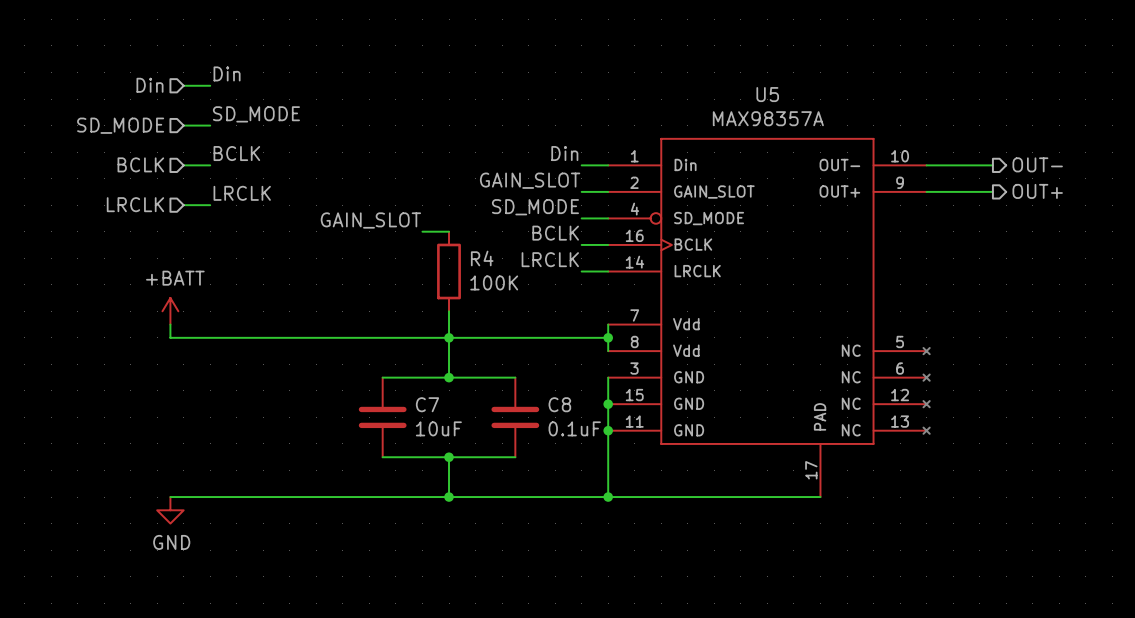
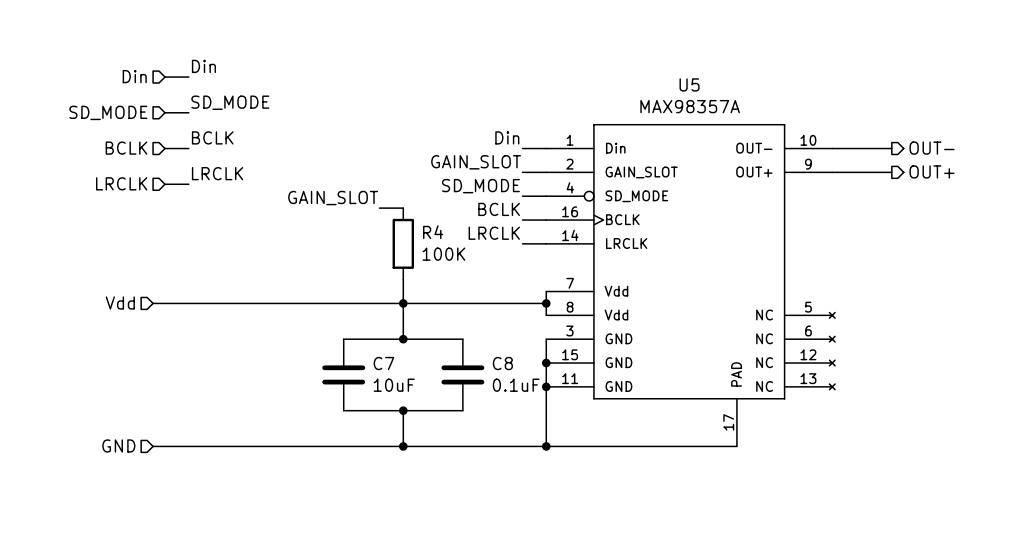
power symbol: +BATT (170, 311) -> none
wire: (170, 324) (170, 337) -> none
hierarchical label: none -> Vdd (120, 302)
hierarchical label: none -> GND (118, 445)
power symbol: GND (170, 510) -> none

